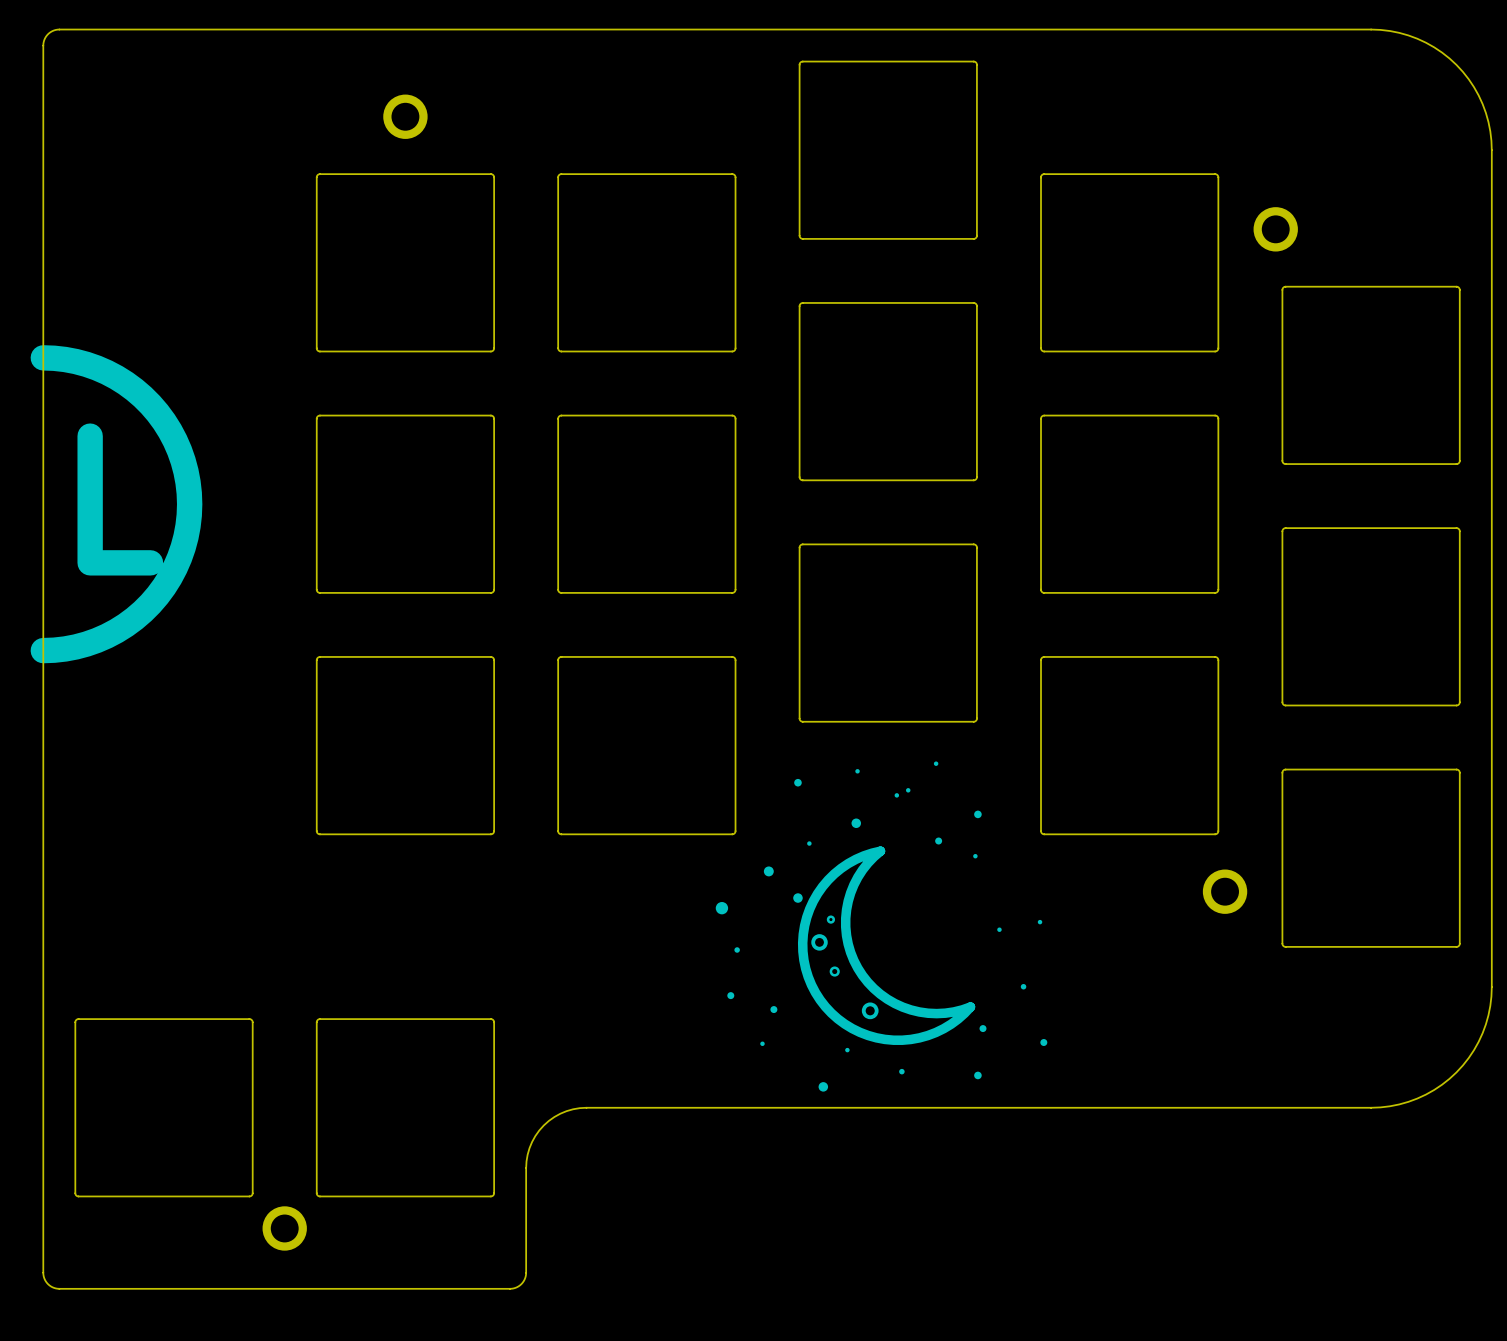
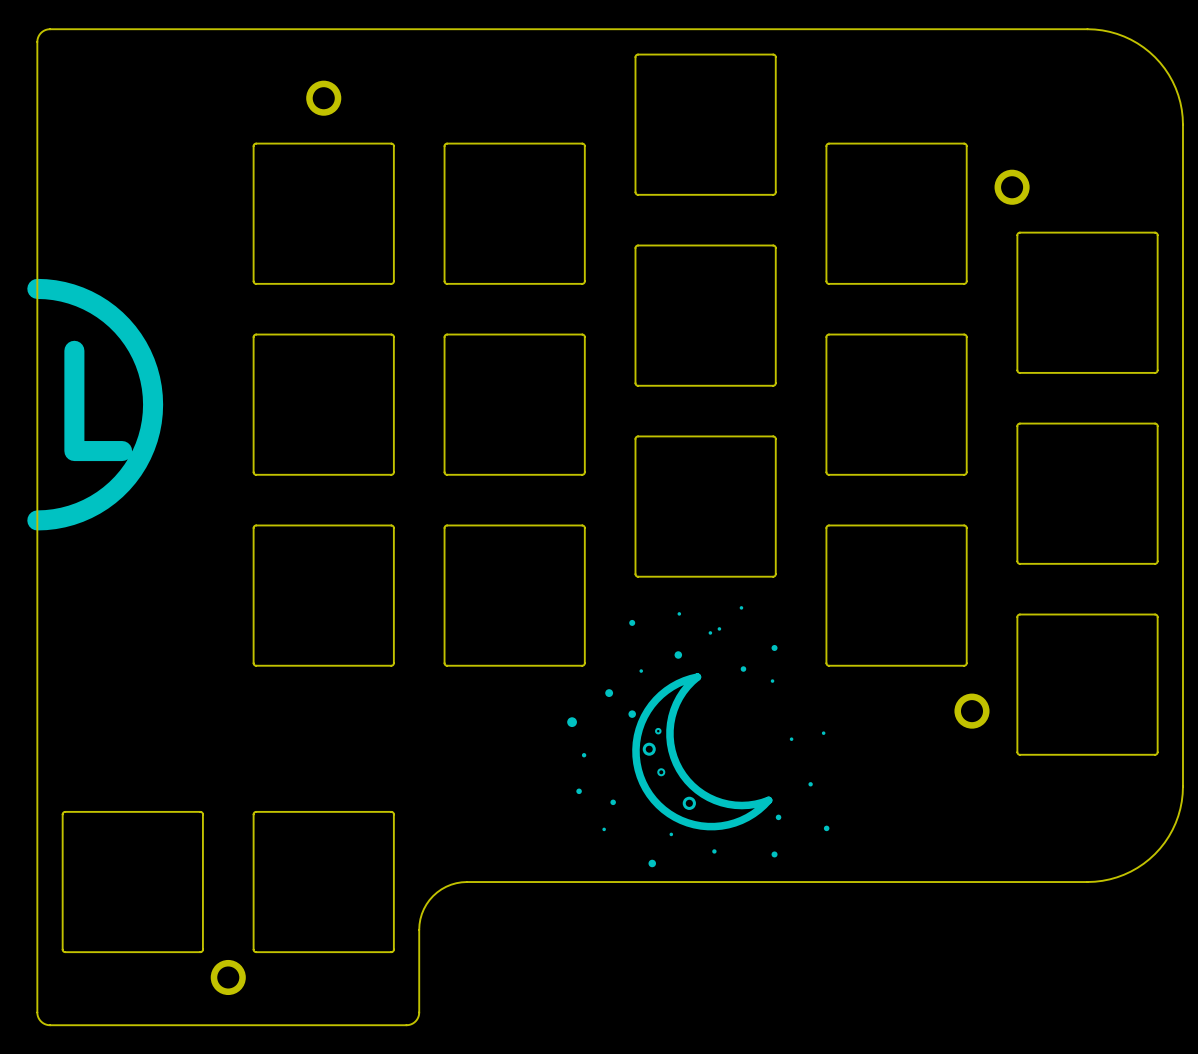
drawing: none -> [739, 606, 744, 610]
drawing: [715, 761, 1048, 1092] -> none
drawing: none -> [677, 612, 682, 616]
drawing: none -> [629, 619, 636, 626]
drawing: none -> [708, 627, 722, 635]
drawing: none -> [771, 644, 778, 651]
drawing: none -> [674, 651, 683, 659]
drawing: none -> [740, 666, 747, 672]
drawing: none -> [639, 669, 643, 673]
line: none -> (697, 677) (678, 683) (666, 690) (647, 710) (637, 735) (636, 756) (638, 769) (649, 794) (669, 813) (687, 822) (701, 825) (728, 824) (753, 813) (768, 800) (741, 805) (715, 800) (697, 790) (679, 769) (670, 743) (671, 716) (679, 697) (697, 677)
drawing: none -> [770, 679, 775, 683]
drawing: none -> [605, 689, 614, 698]
drawing: none -> [628, 710, 636, 718]
drawing: none -> [567, 717, 577, 728]
drawing: none -> [642, 727, 662, 756]
drawing: none -> [821, 731, 826, 735]
drawing: none -> [789, 737, 794, 741]
drawing: none -> [581, 753, 587, 758]
drawing: none -> [657, 768, 666, 777]
drawing: none -> [808, 782, 813, 787]
drawing: none -> [576, 788, 582, 795]
drawing: none -> [682, 796, 696, 810]
drawing: none -> [610, 799, 616, 806]
drawing: none -> [775, 814, 782, 821]
drawing: none -> [823, 825, 830, 832]
drawing: none -> [602, 827, 606, 832]
drawing: none -> [669, 832, 674, 837]
drawing: none -> [712, 849, 717, 854]
drawing: none -> [771, 851, 778, 858]
drawing: none -> [648, 859, 657, 868]

